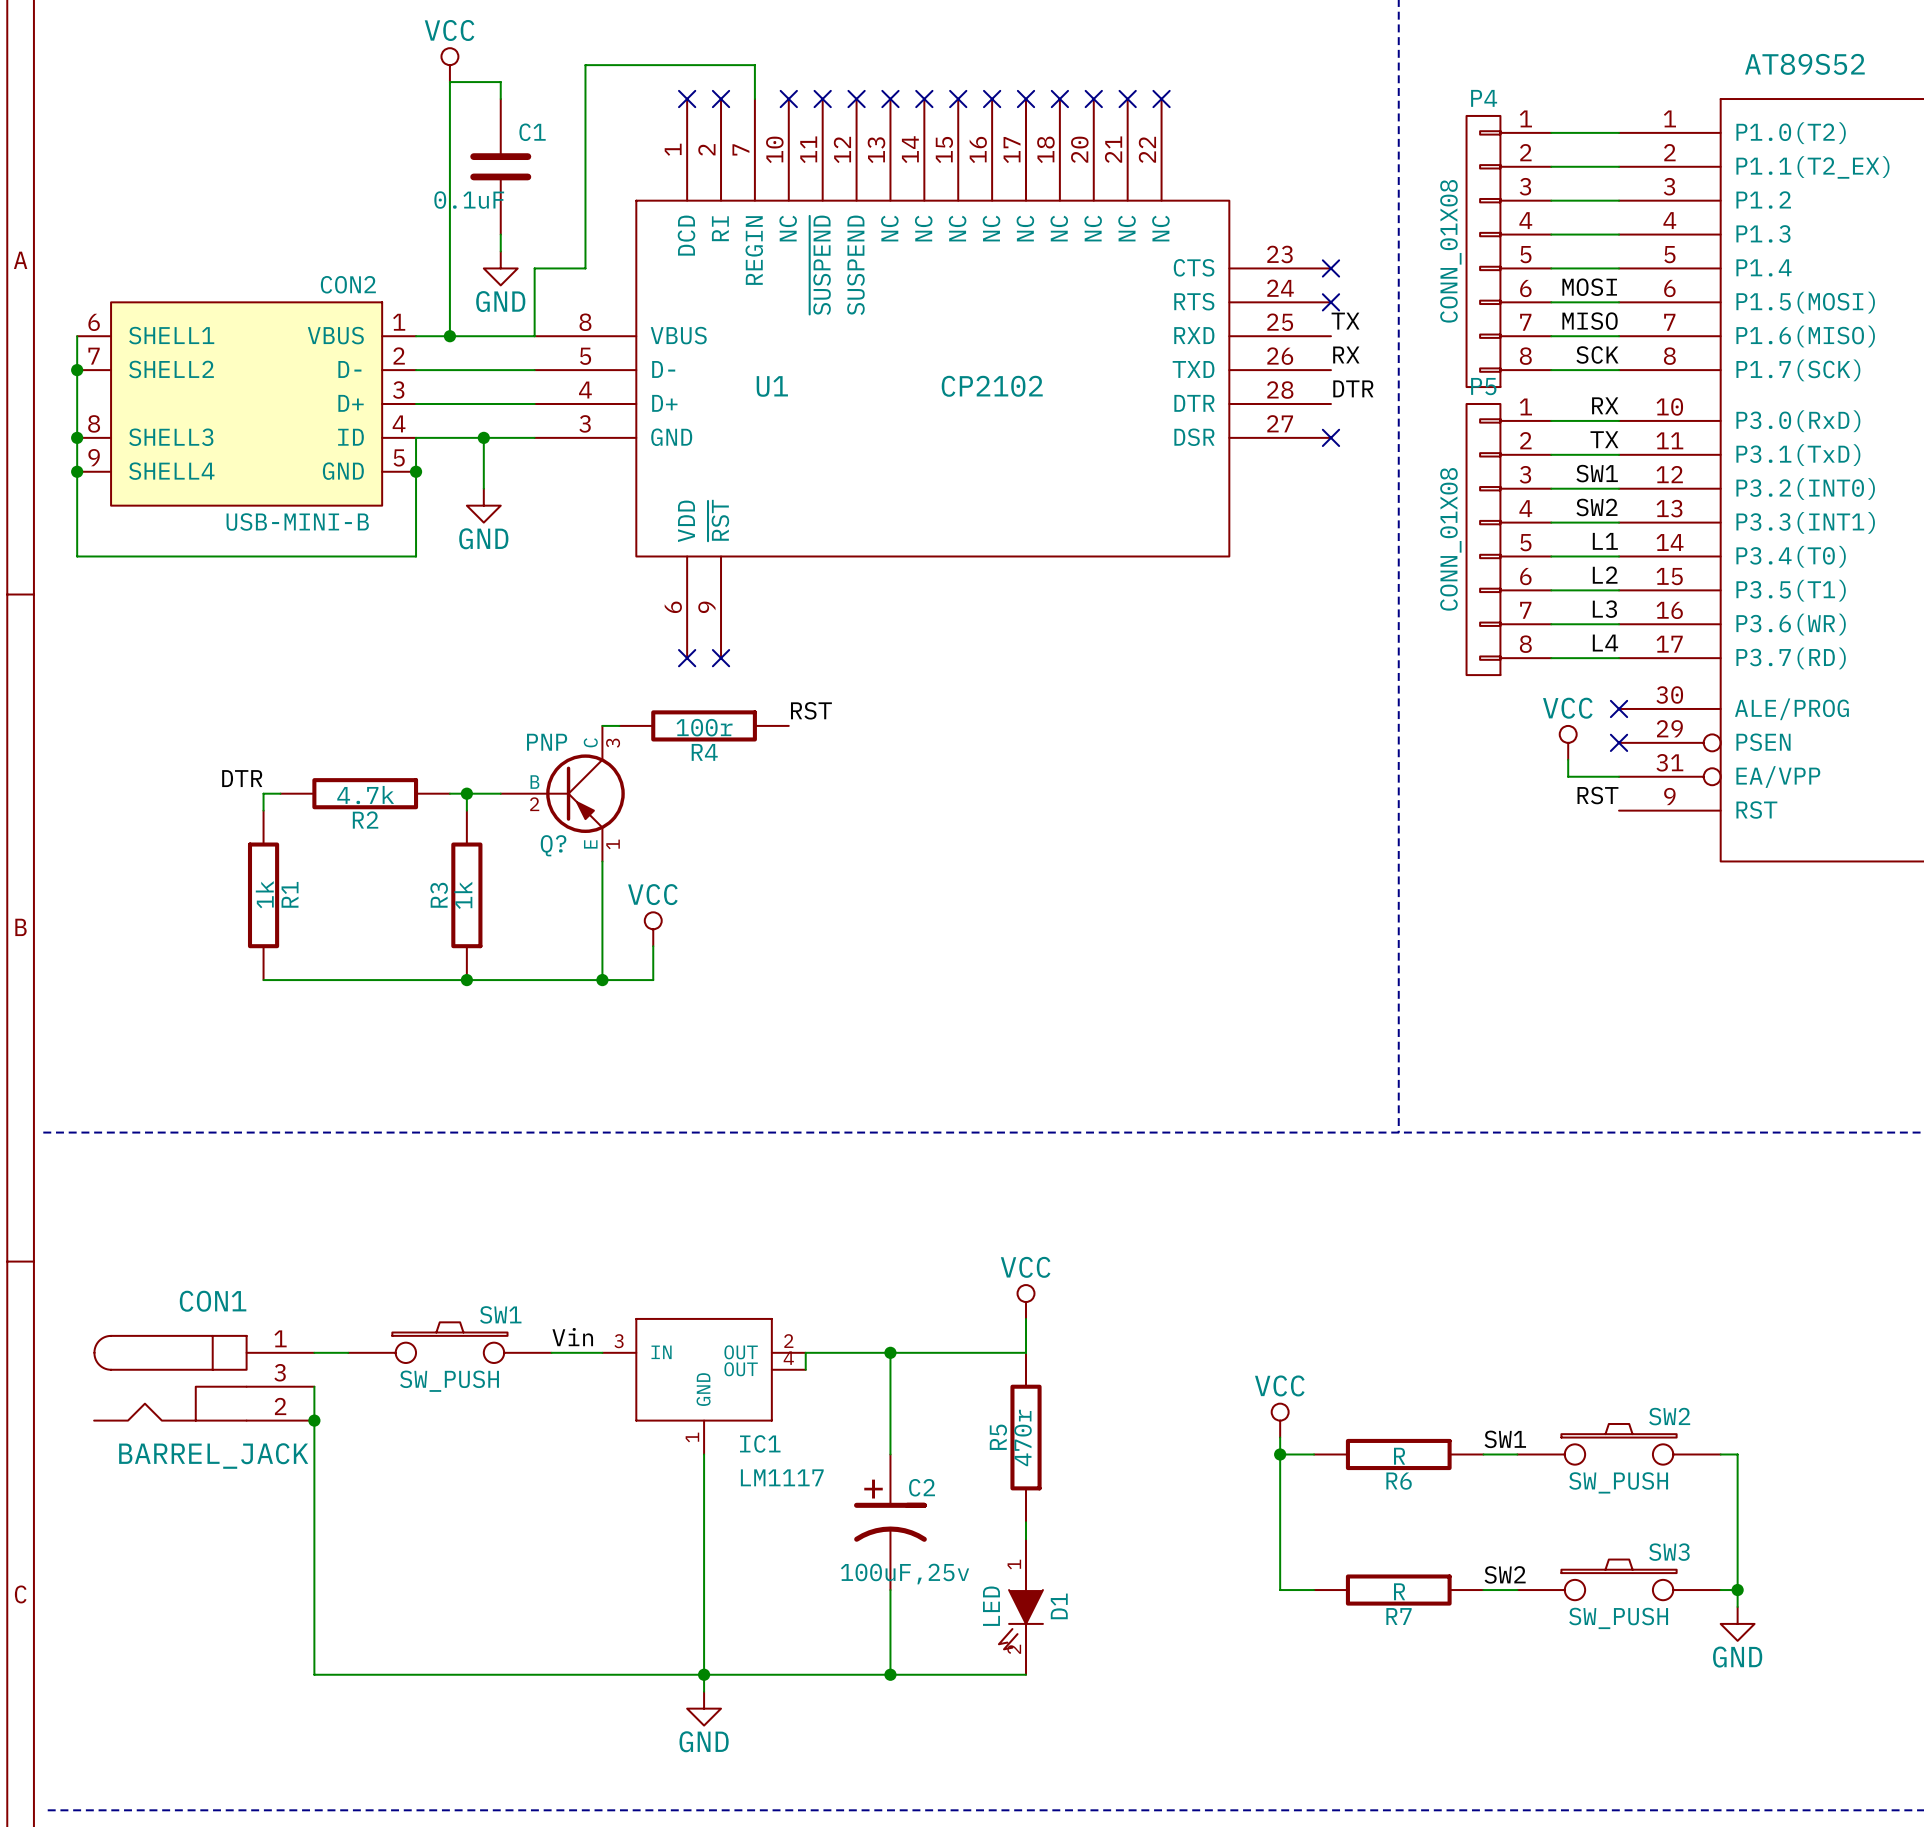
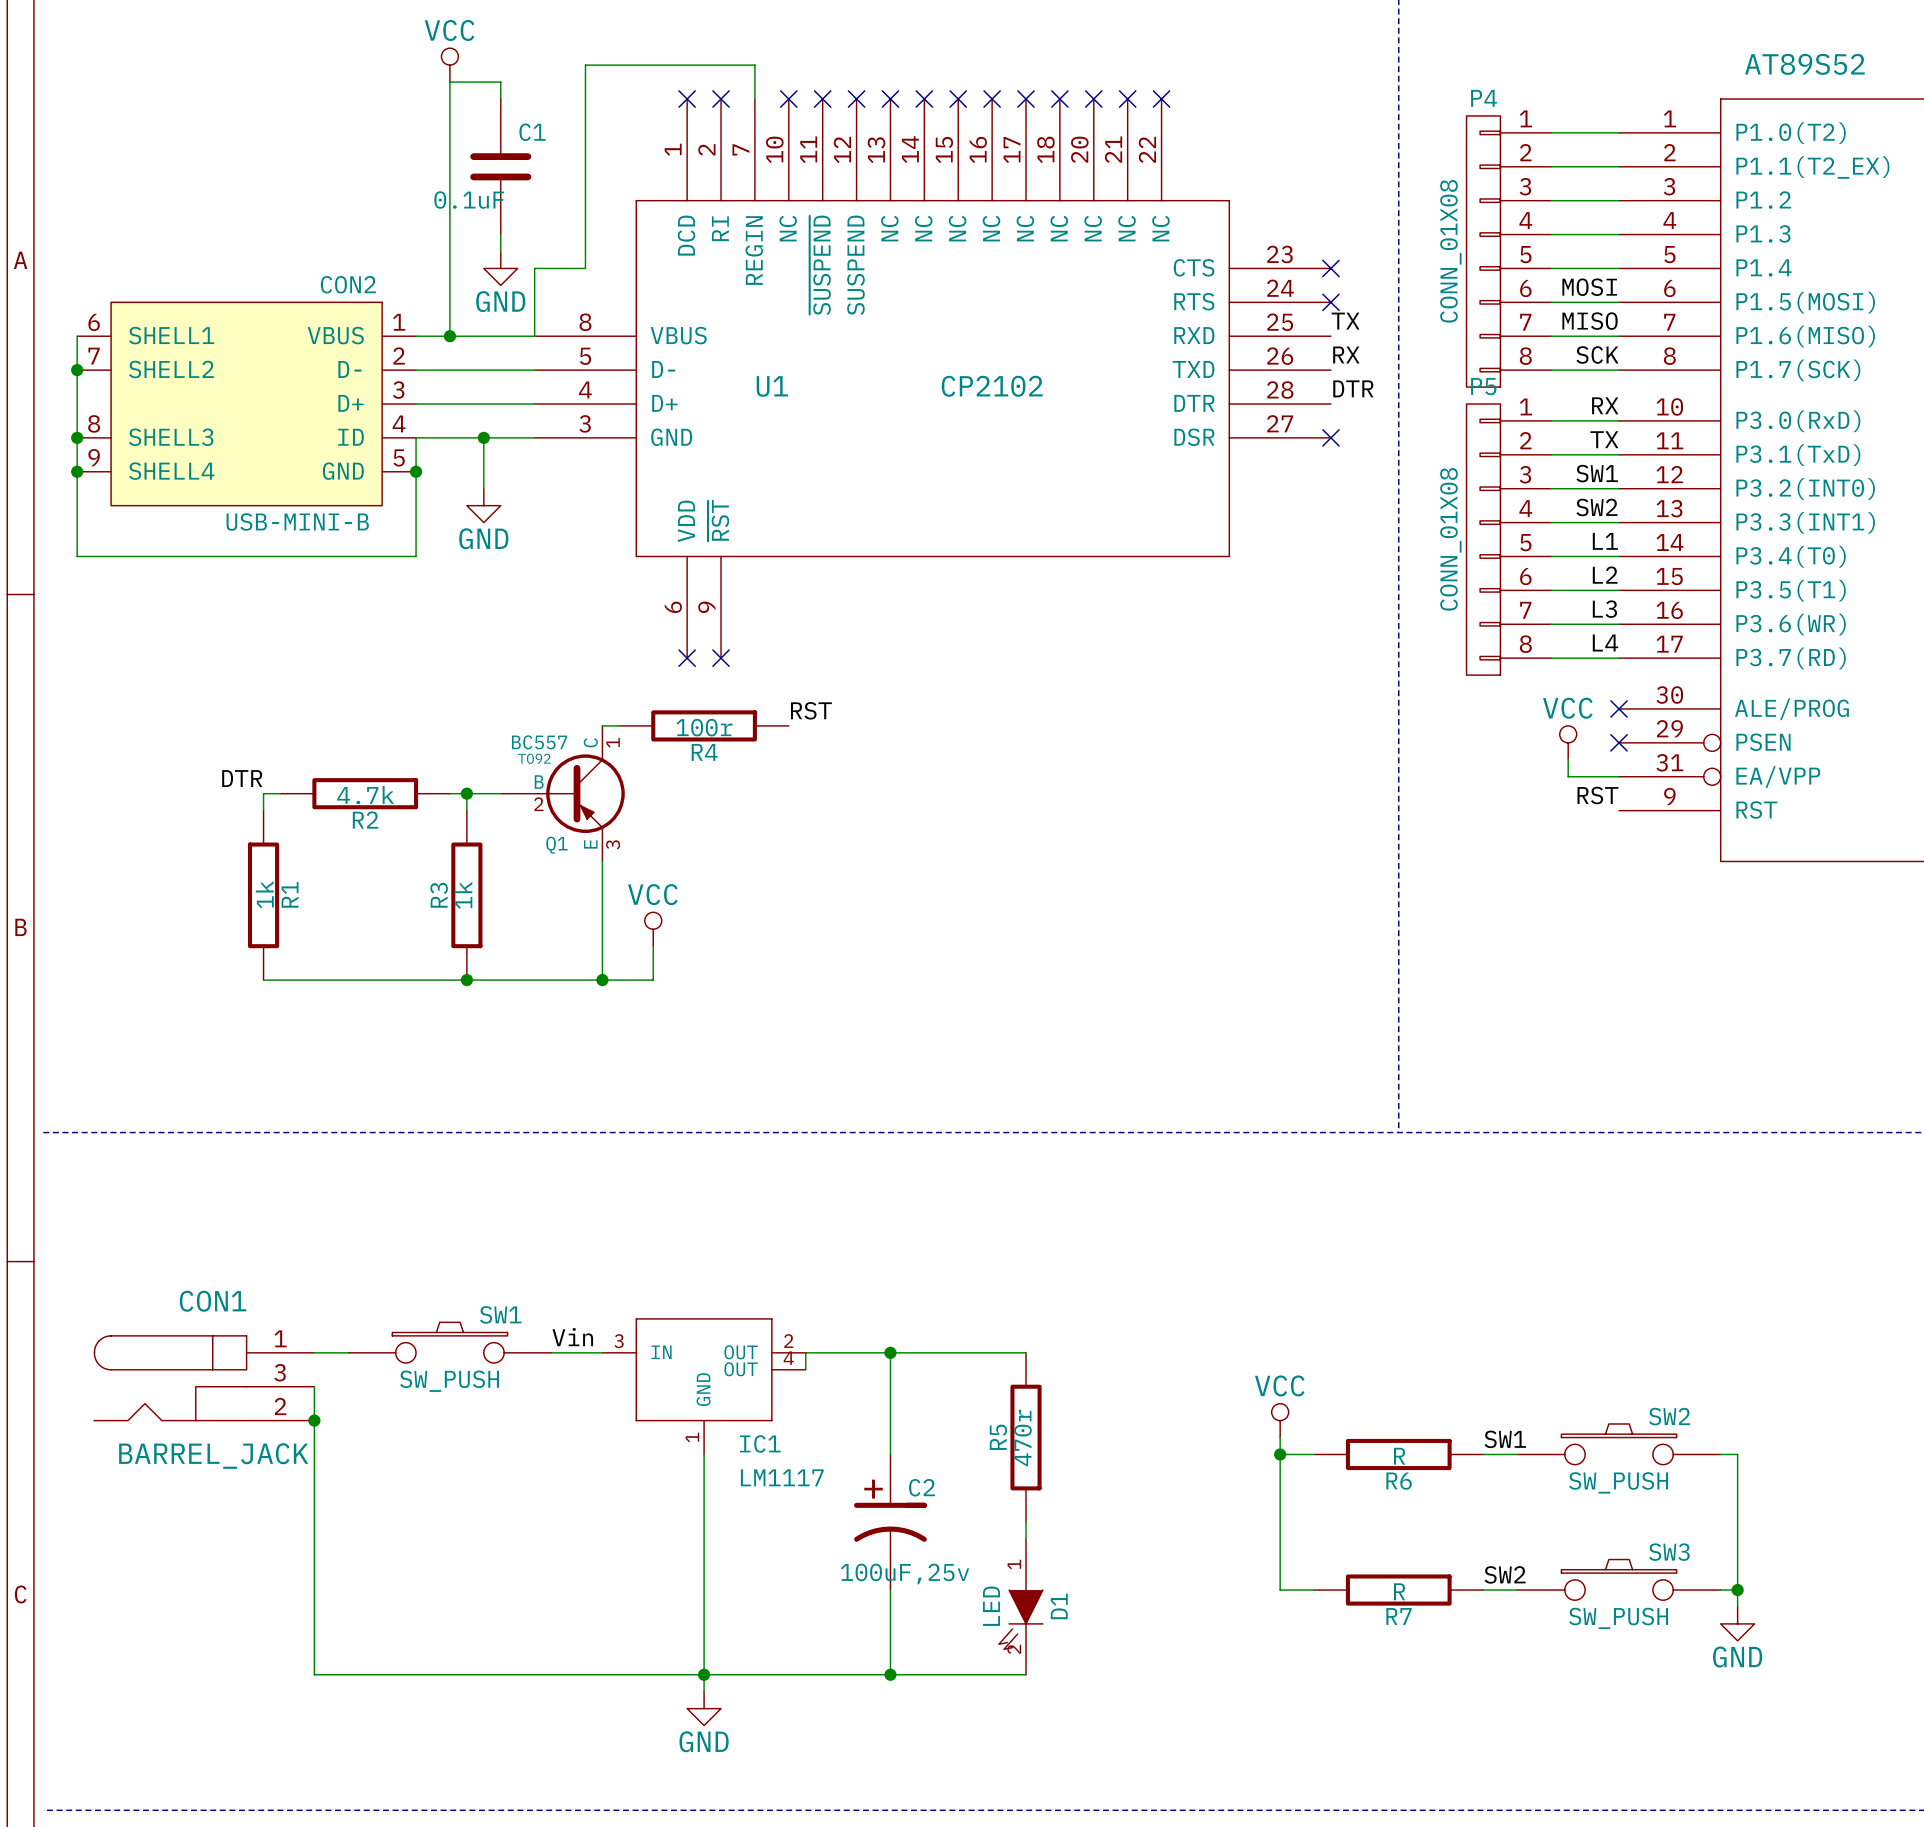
Q?: PNP (562, 793) -> none
Q1: none -> BC557 (562, 793)
power symbol: VCC (1026, 1302) -> none
wire: (1026, 1318) (1026, 1352) -> none

